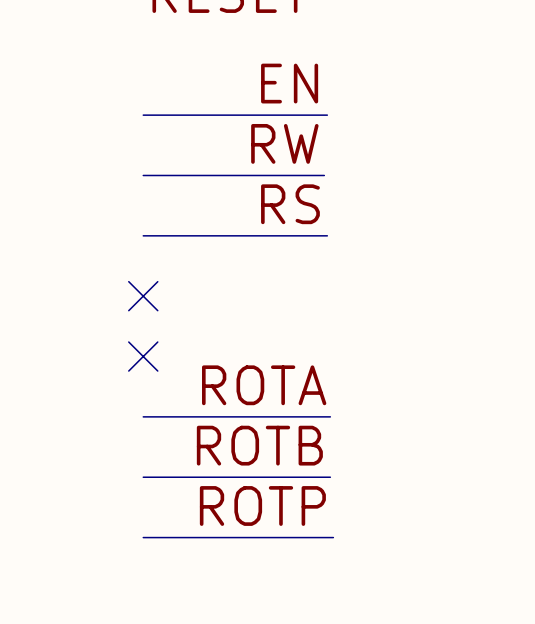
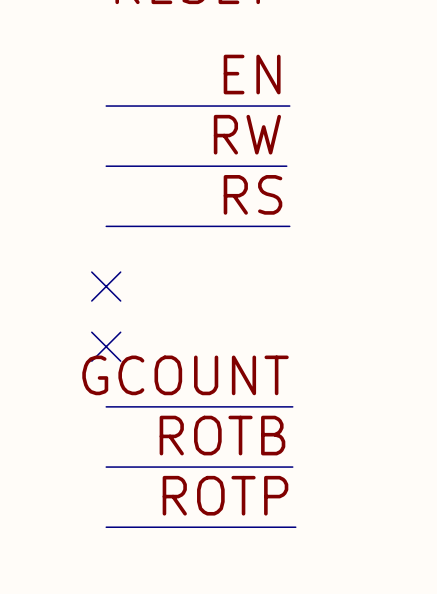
label: ROTA (264, 385) -> GCOUNT (185, 375)

